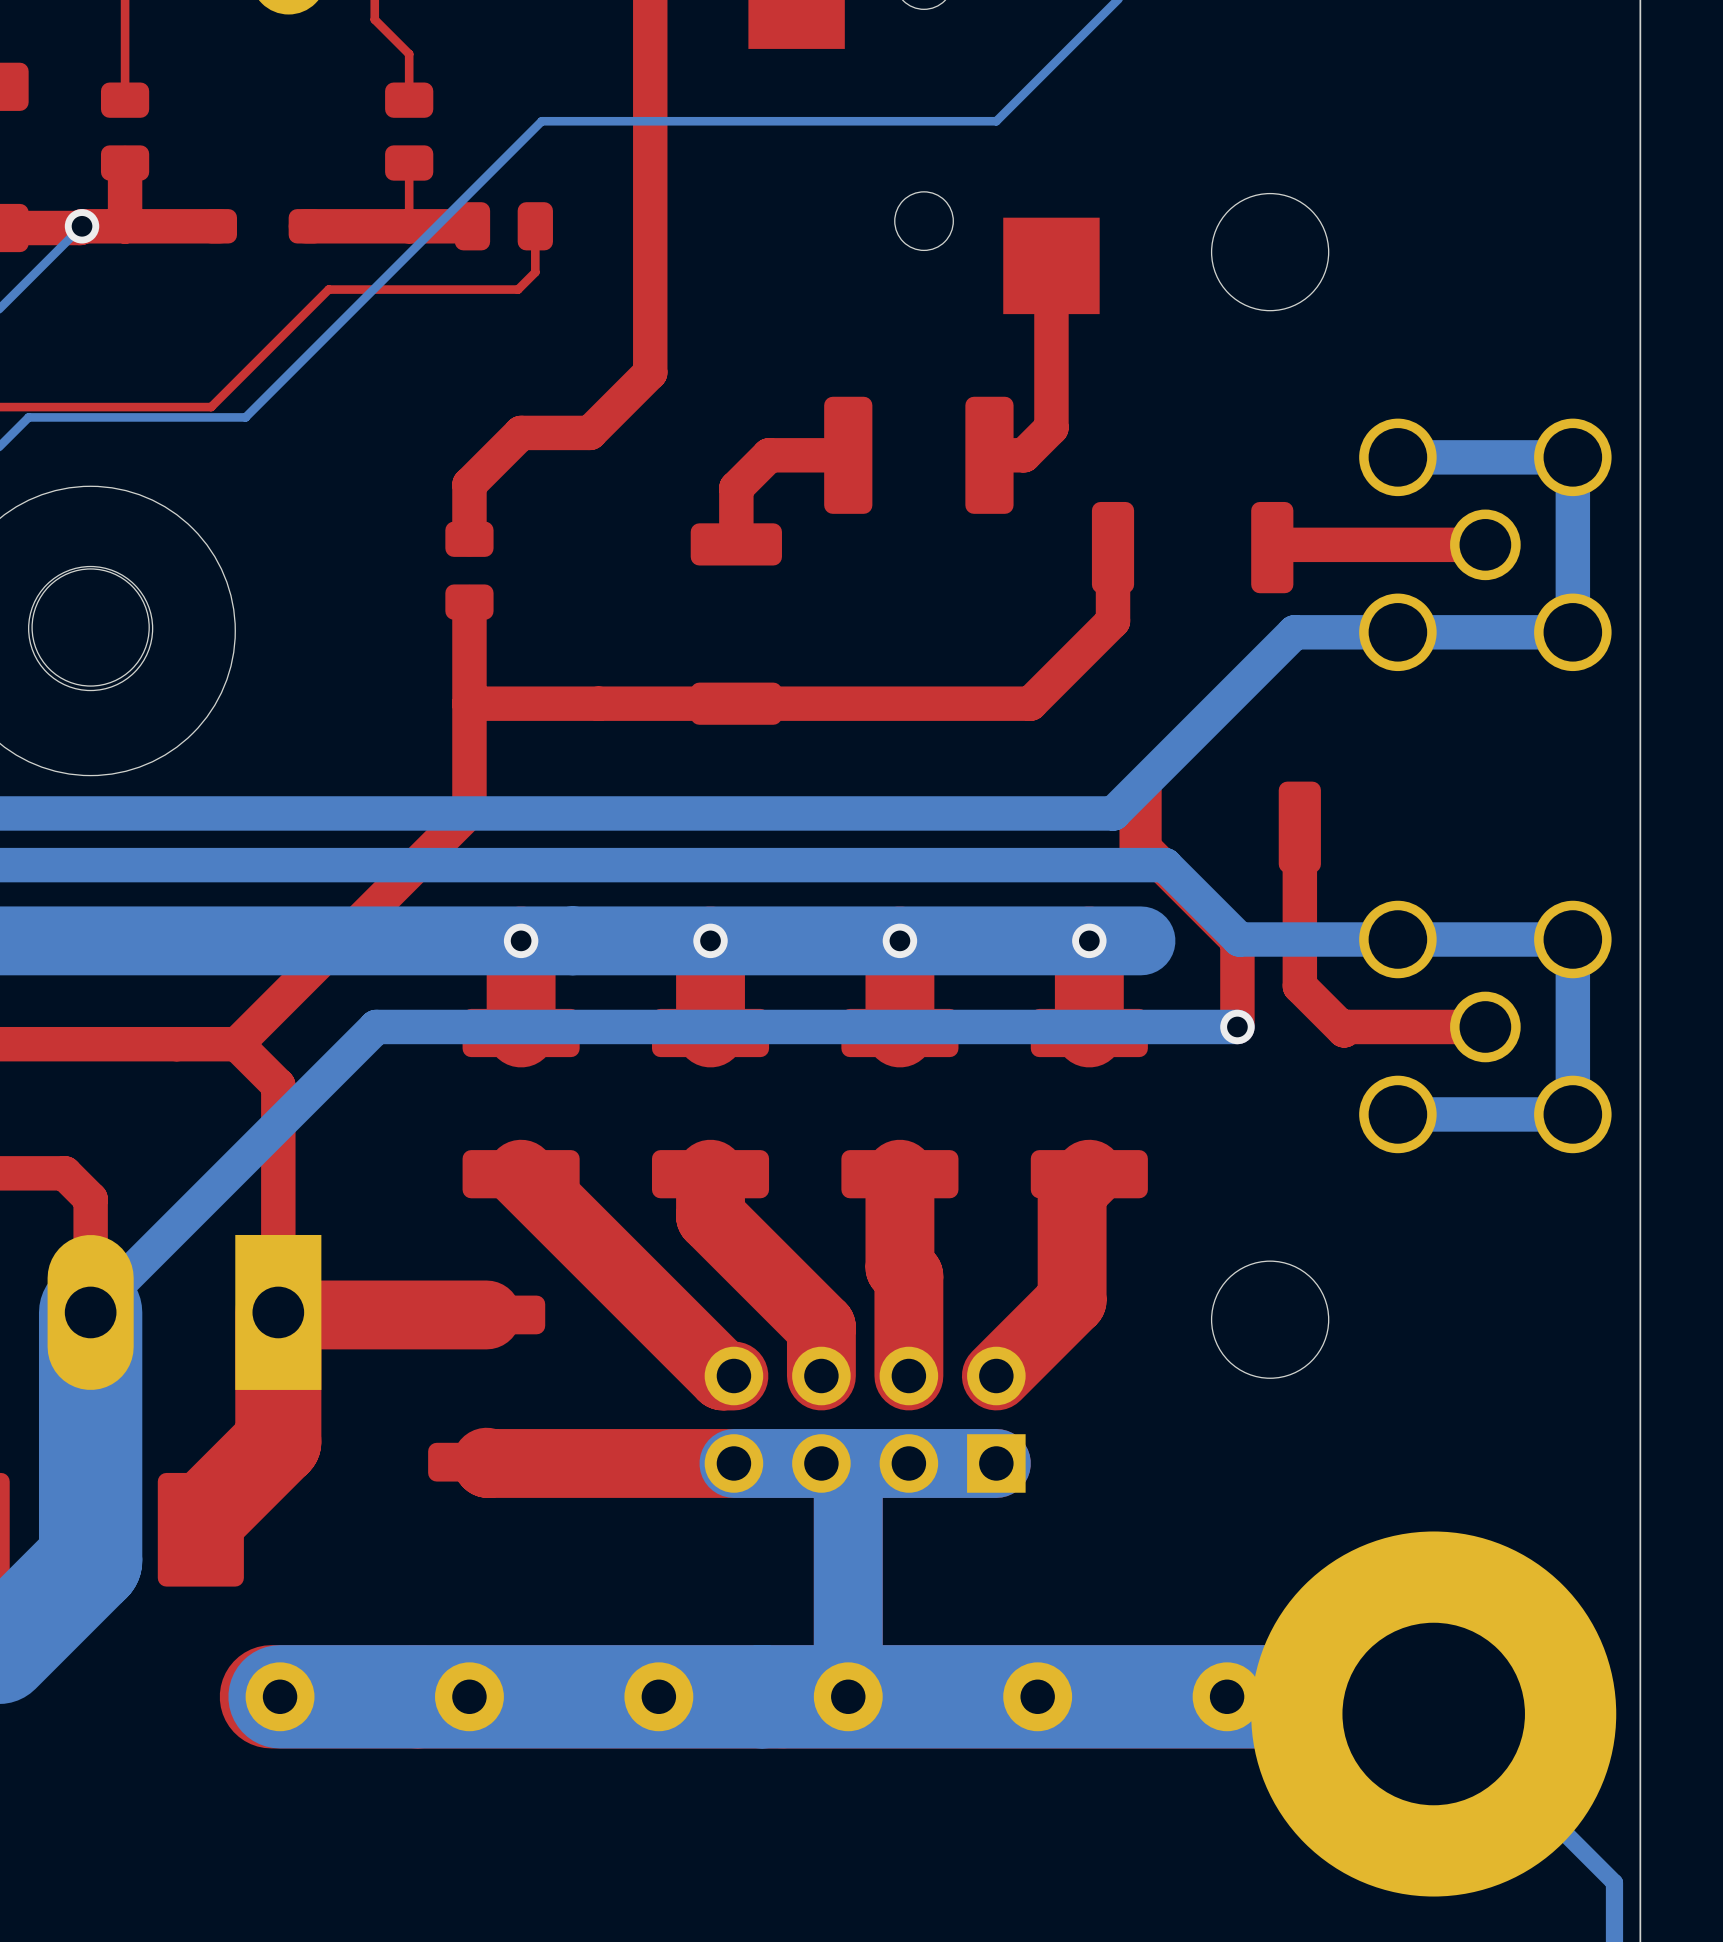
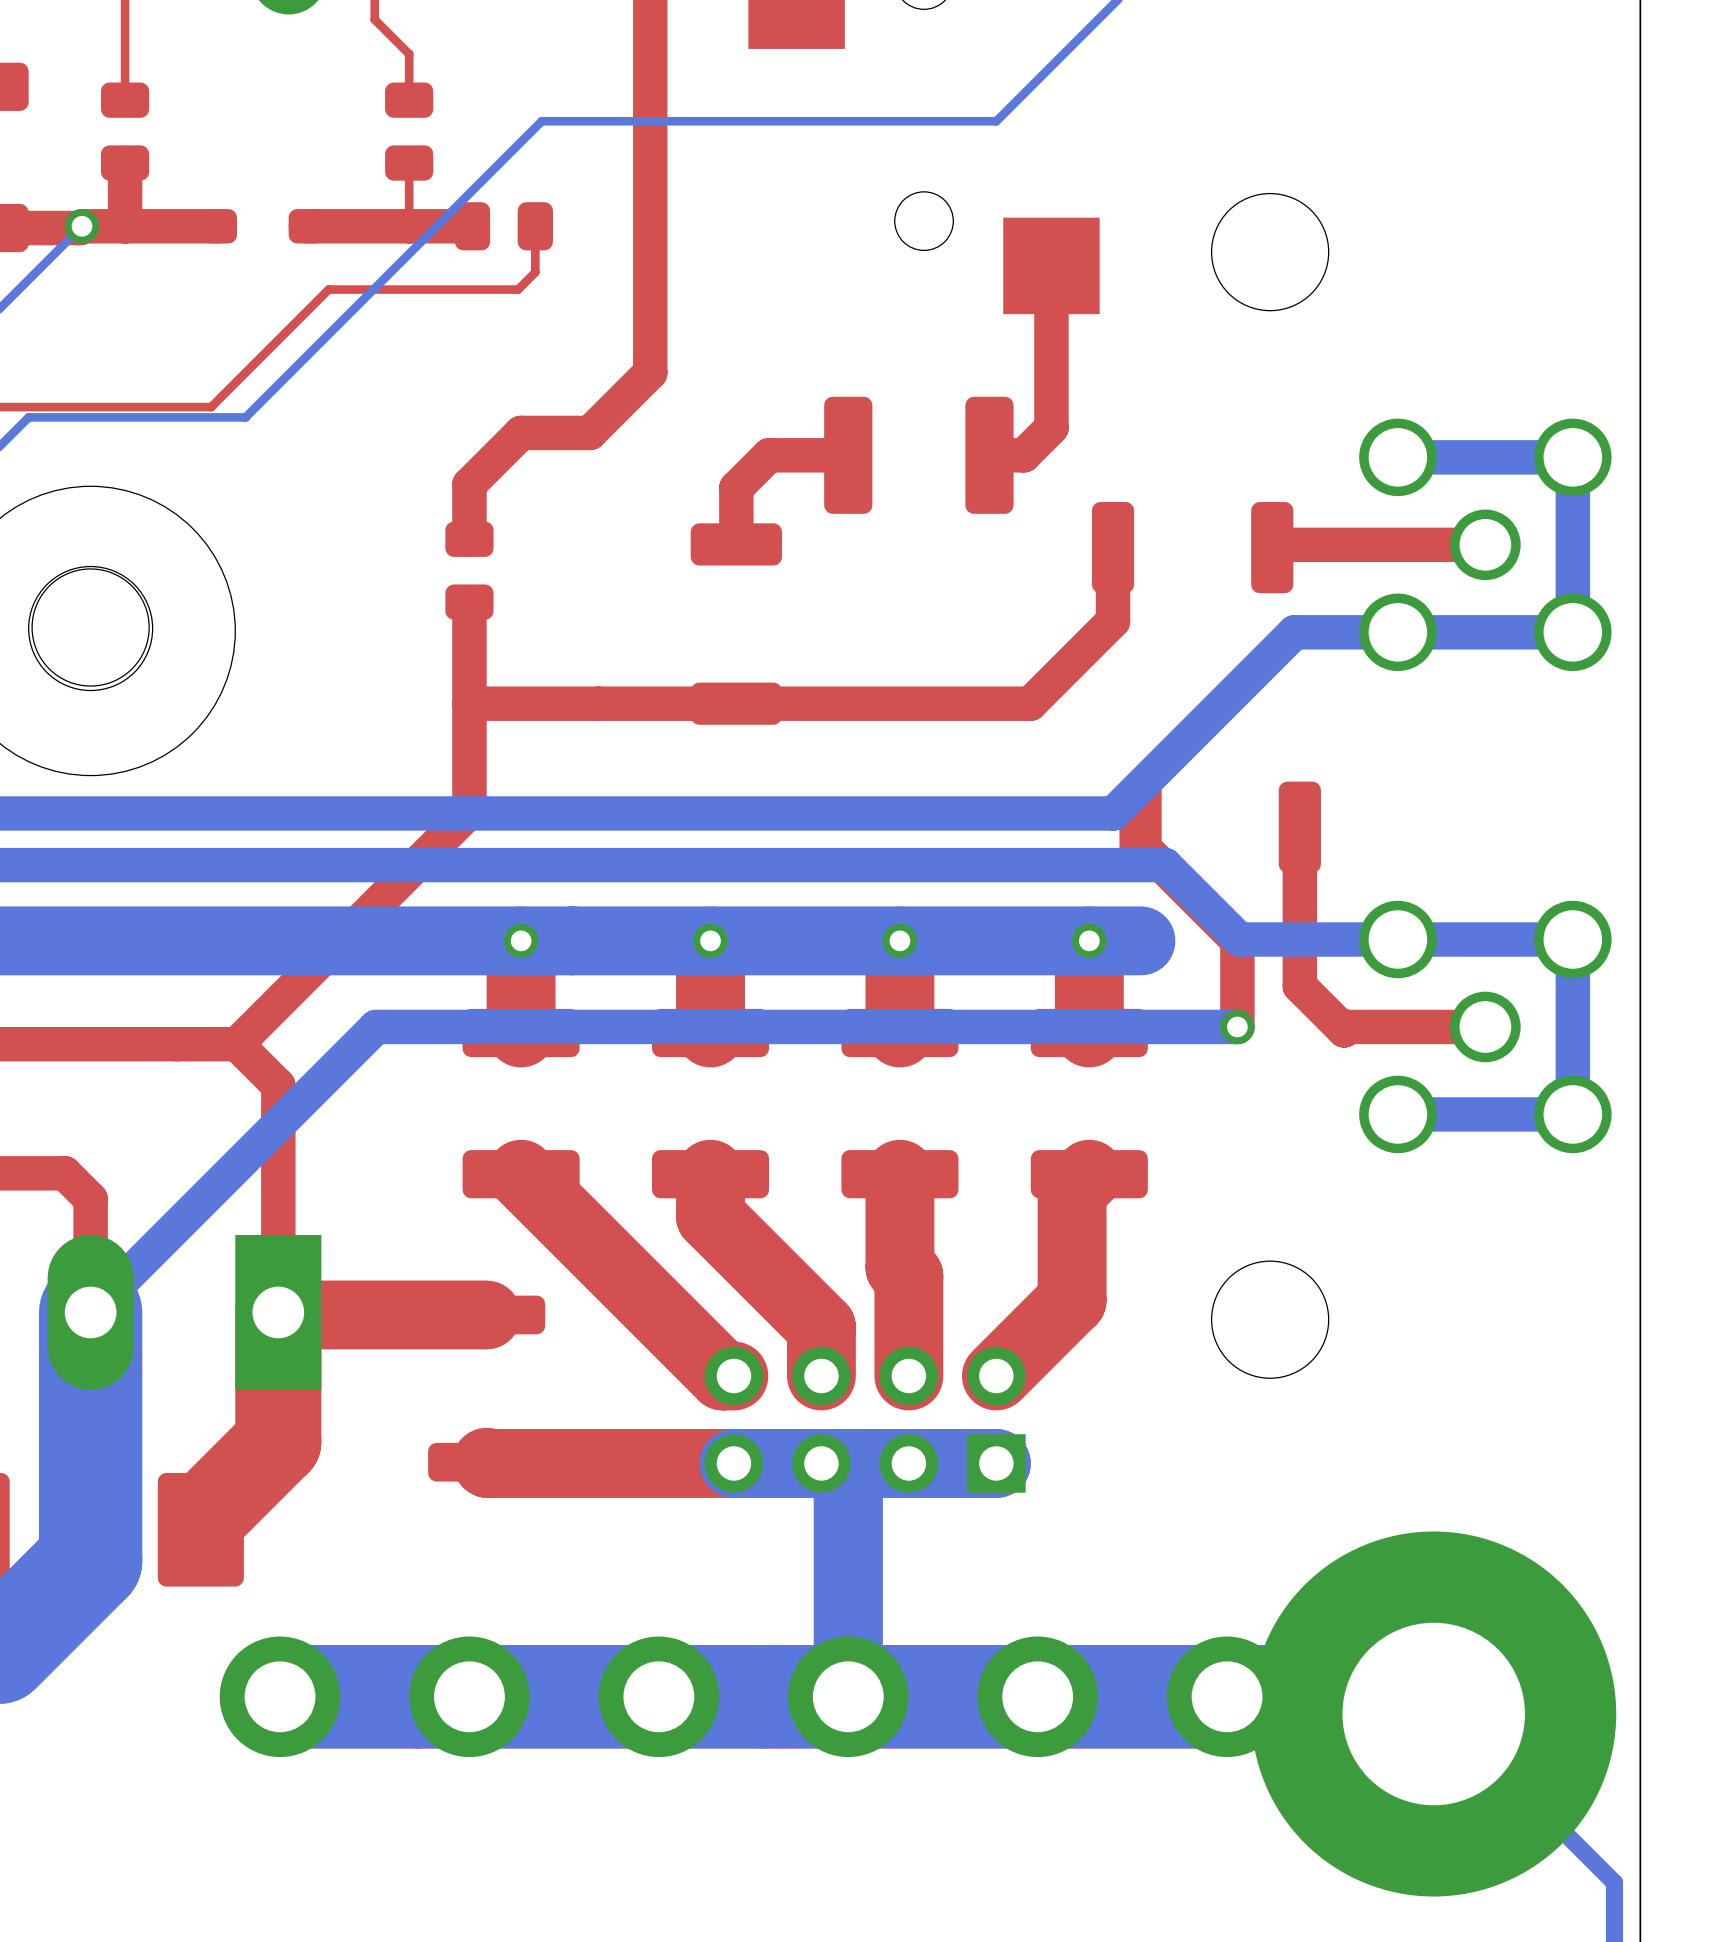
part: none -> (280, 1696)
part: none -> (469, 1696)
part: none -> (658, 1696)
part: none -> (848, 1696)
part: none -> (1037, 1696)
part: none -> (1227, 1696)

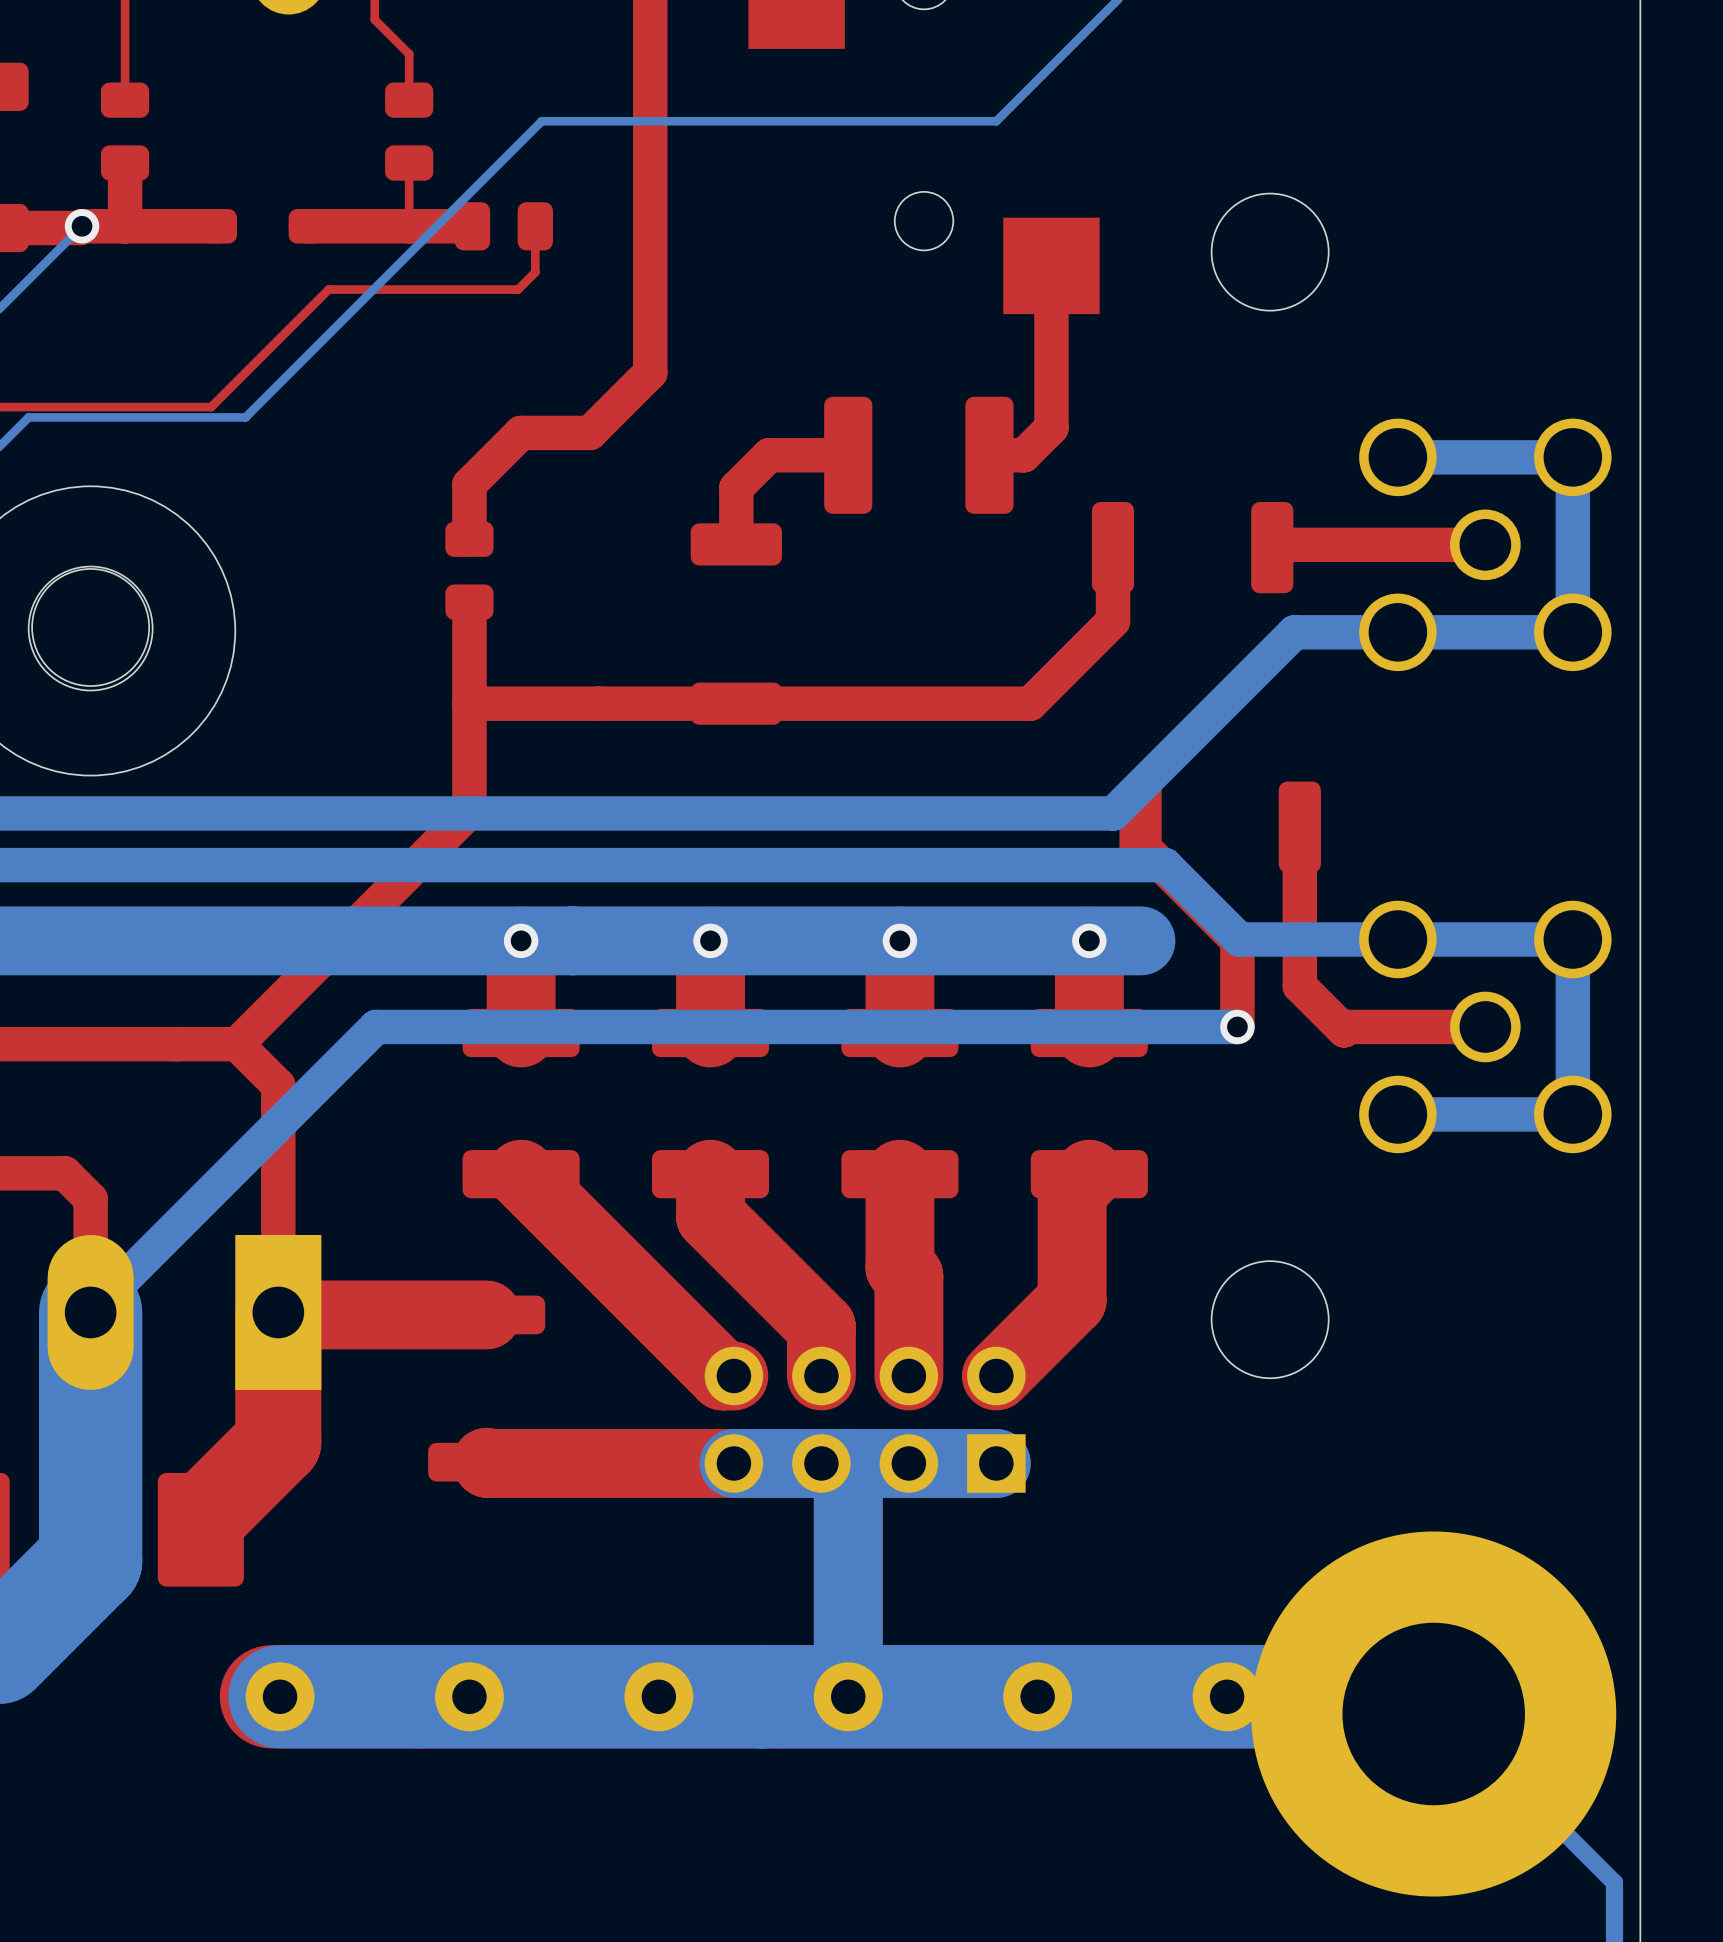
part: (280, 1696) -> none
part: (469, 1696) -> none
part: (658, 1696) -> none
part: (848, 1696) -> none
part: (1037, 1696) -> none
part: (1227, 1696) -> none

